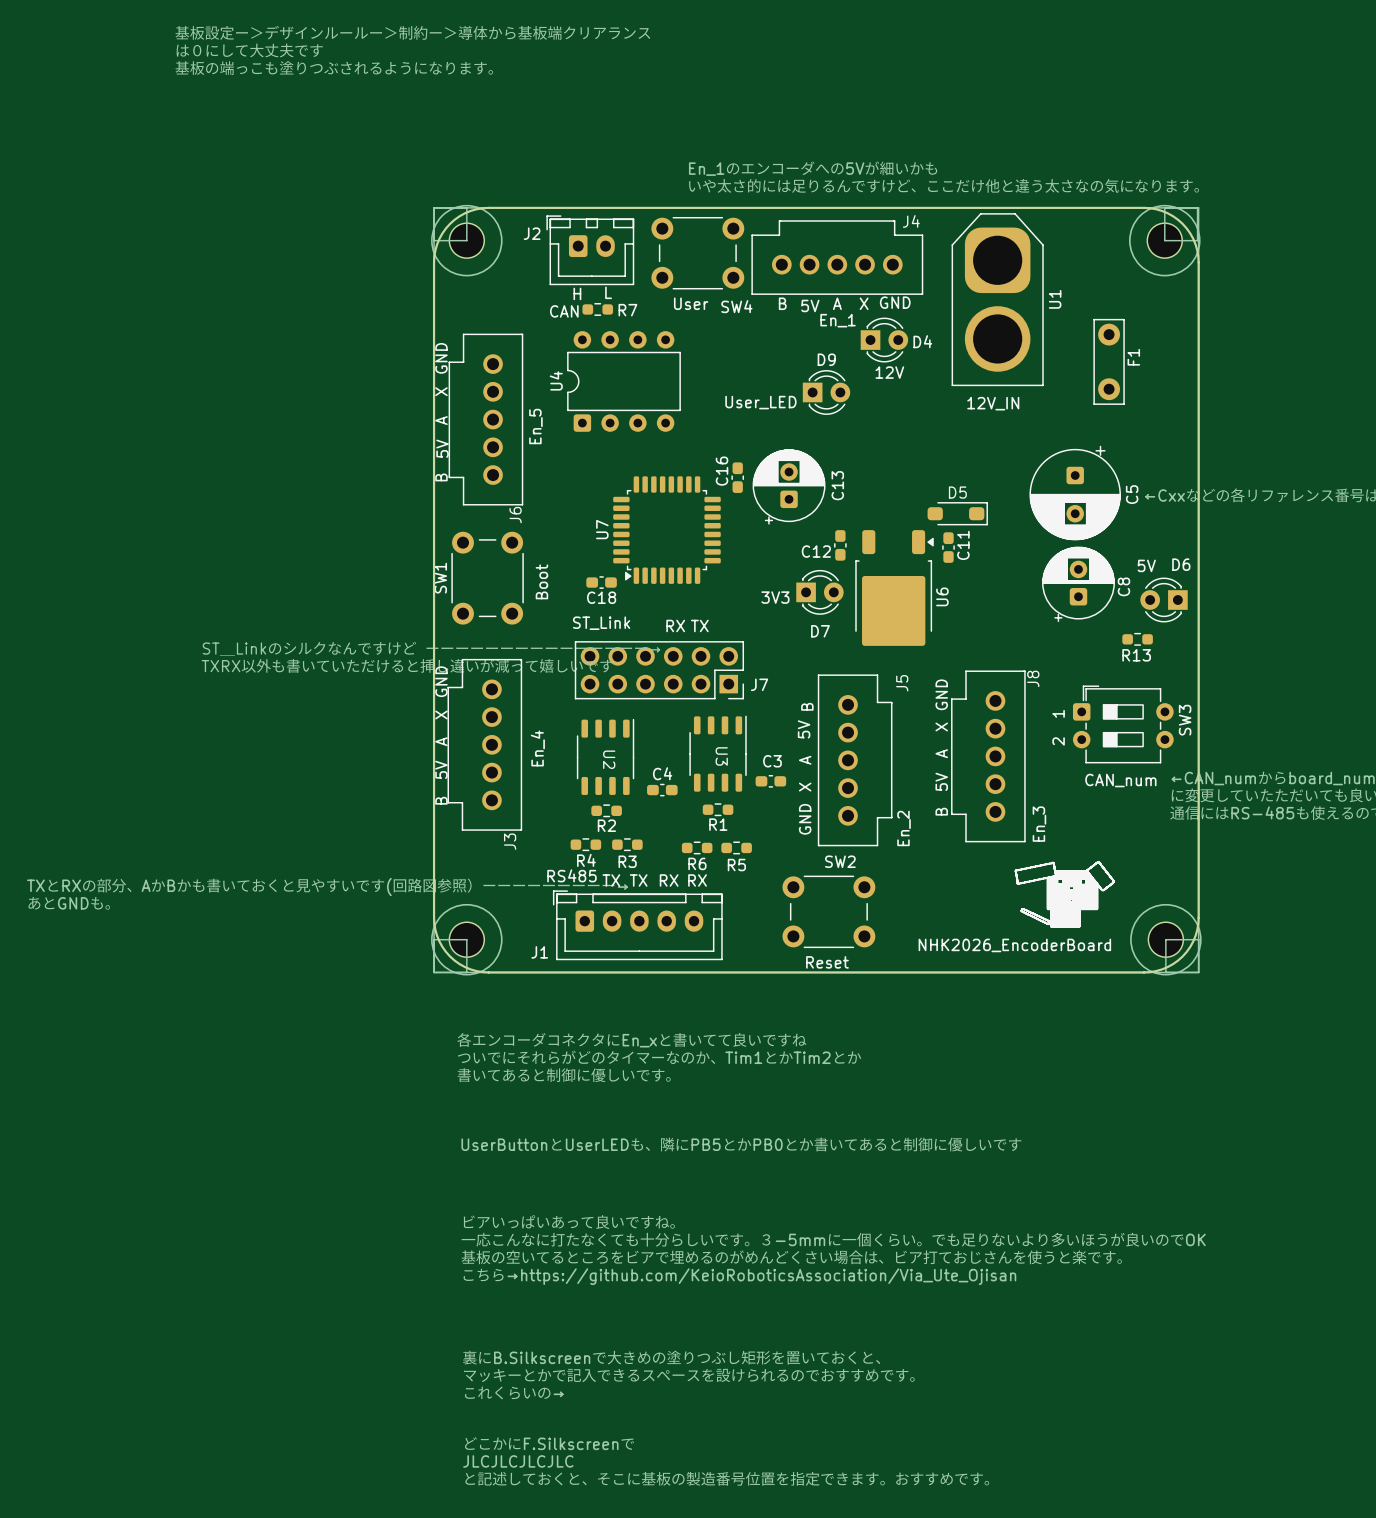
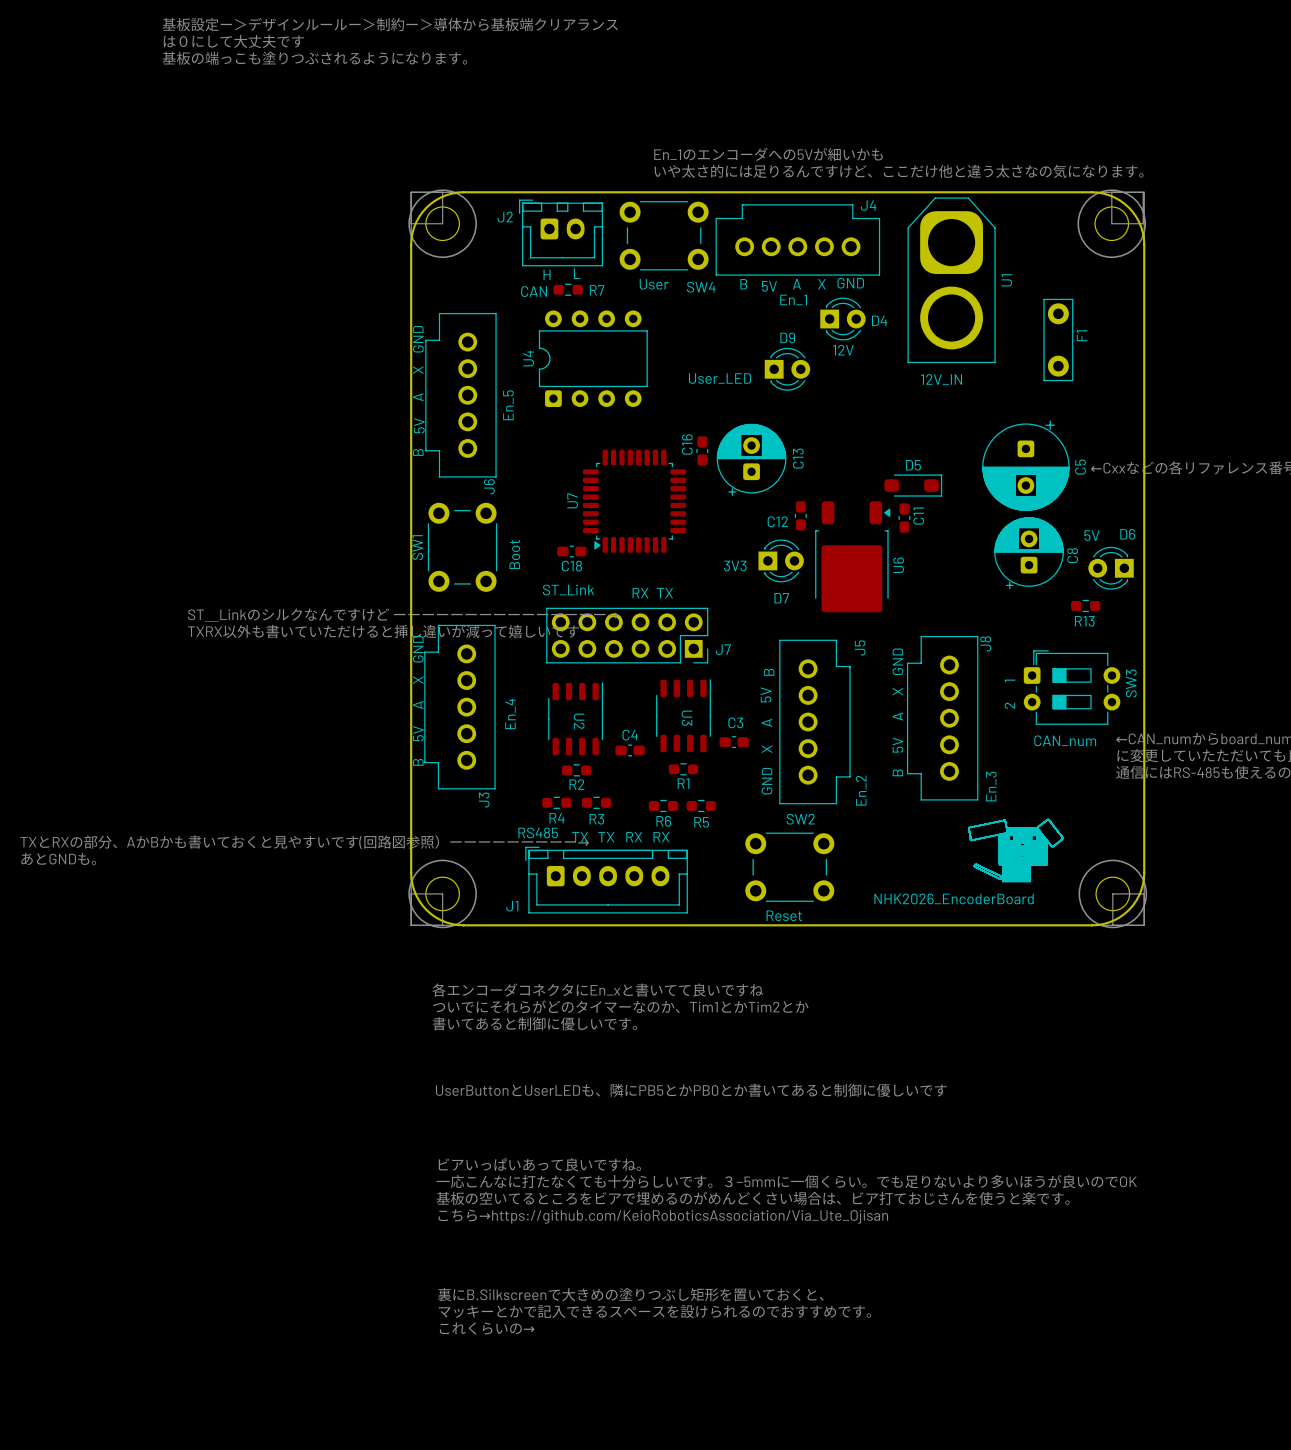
text: どこかにF.Silkscreenで (549, 1443) -> none
text: JLCJLCJLCJLC (518, 1461) -> none
text: と記述しておくと、そこに基板の製造番号位置を指定できます。おすすめです。 (727, 1478) -> none

